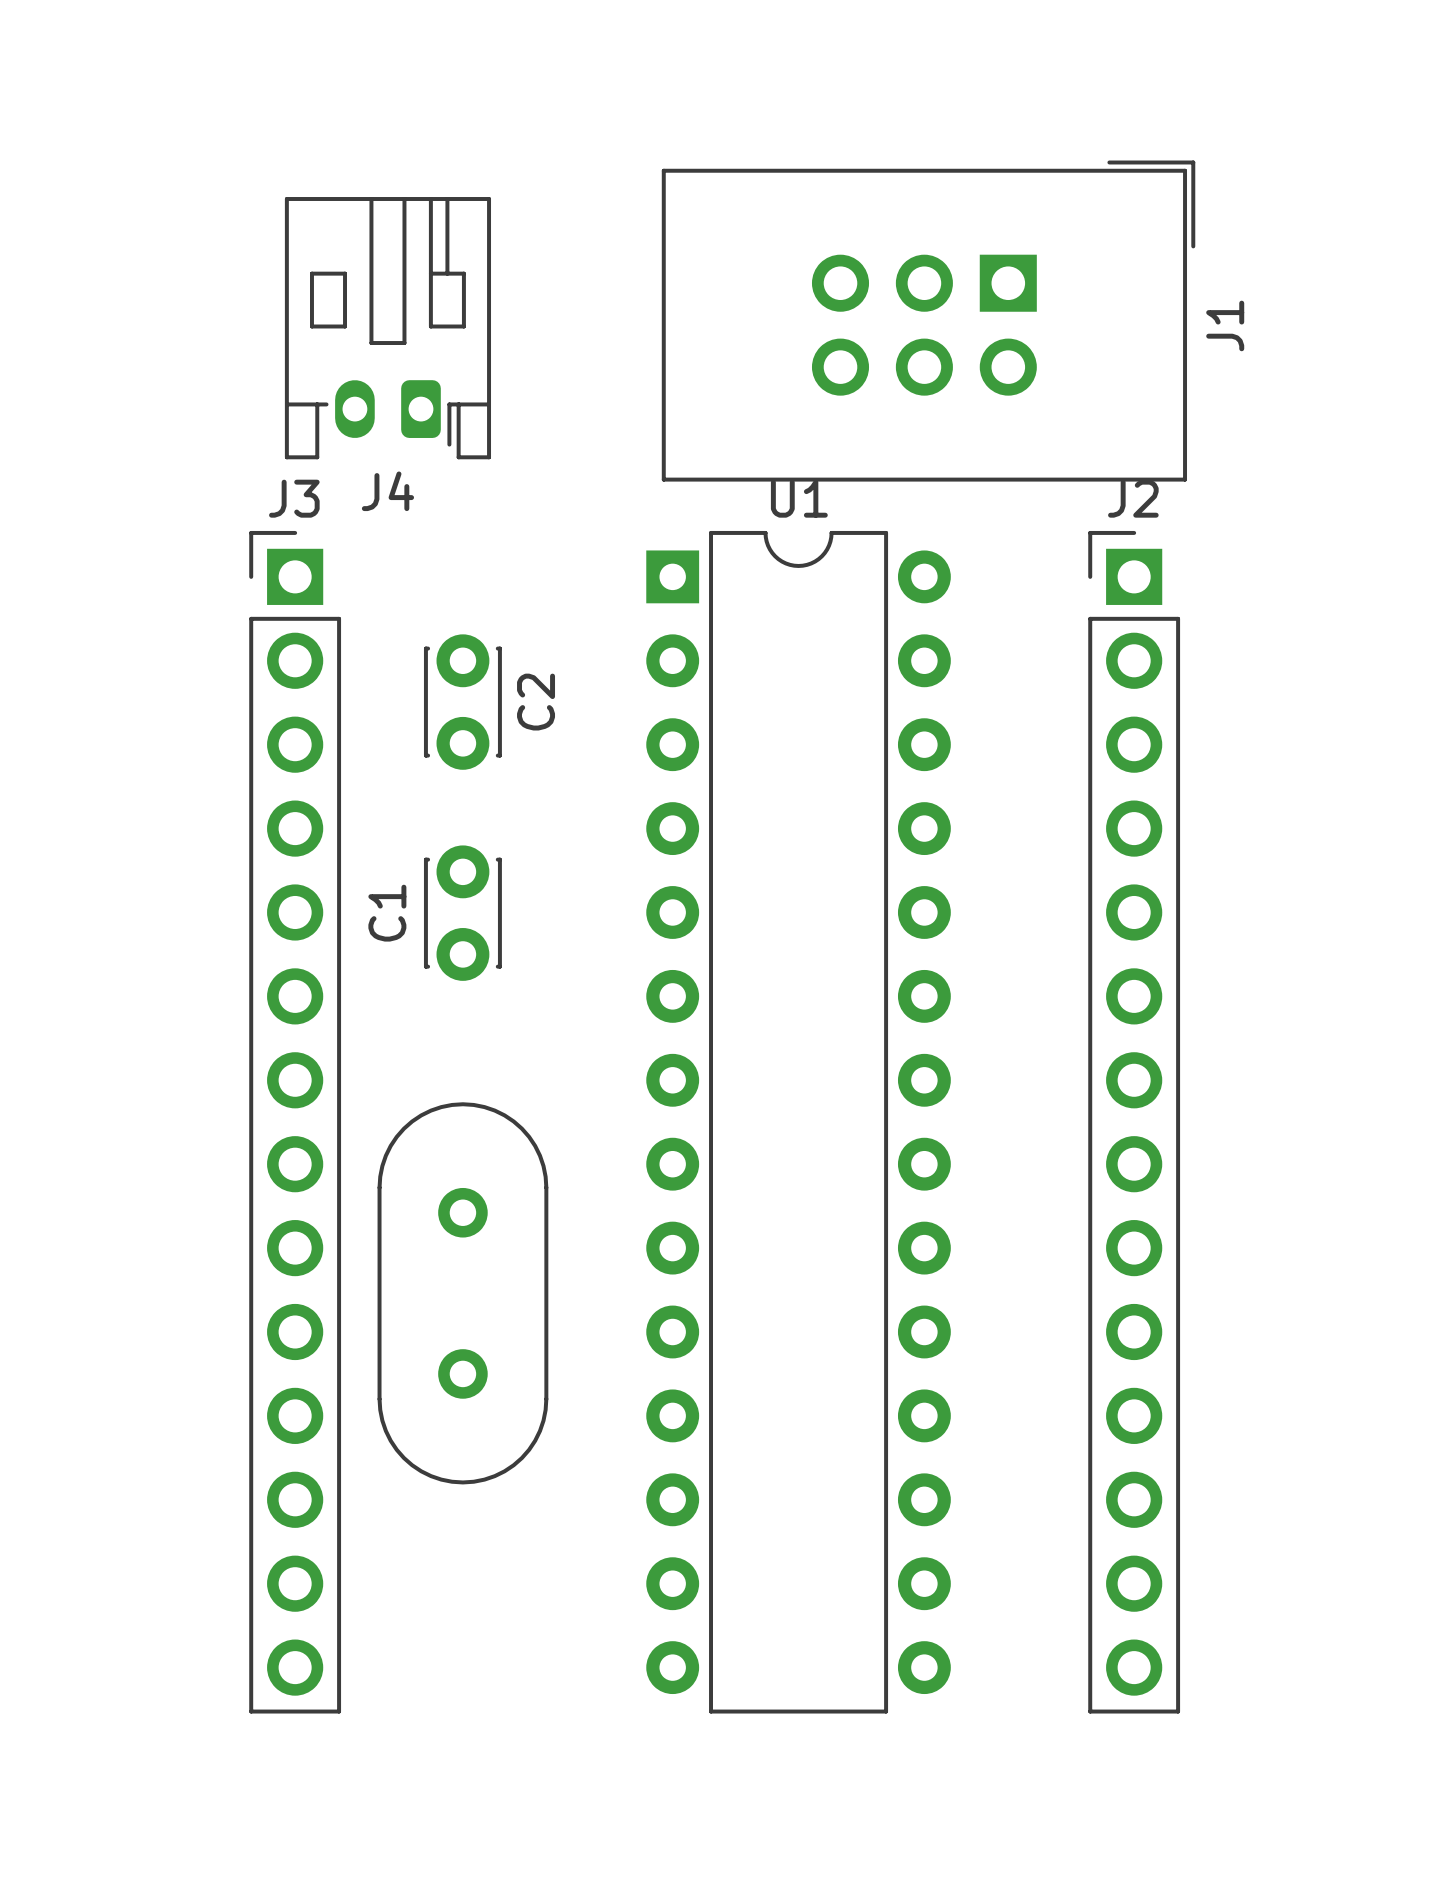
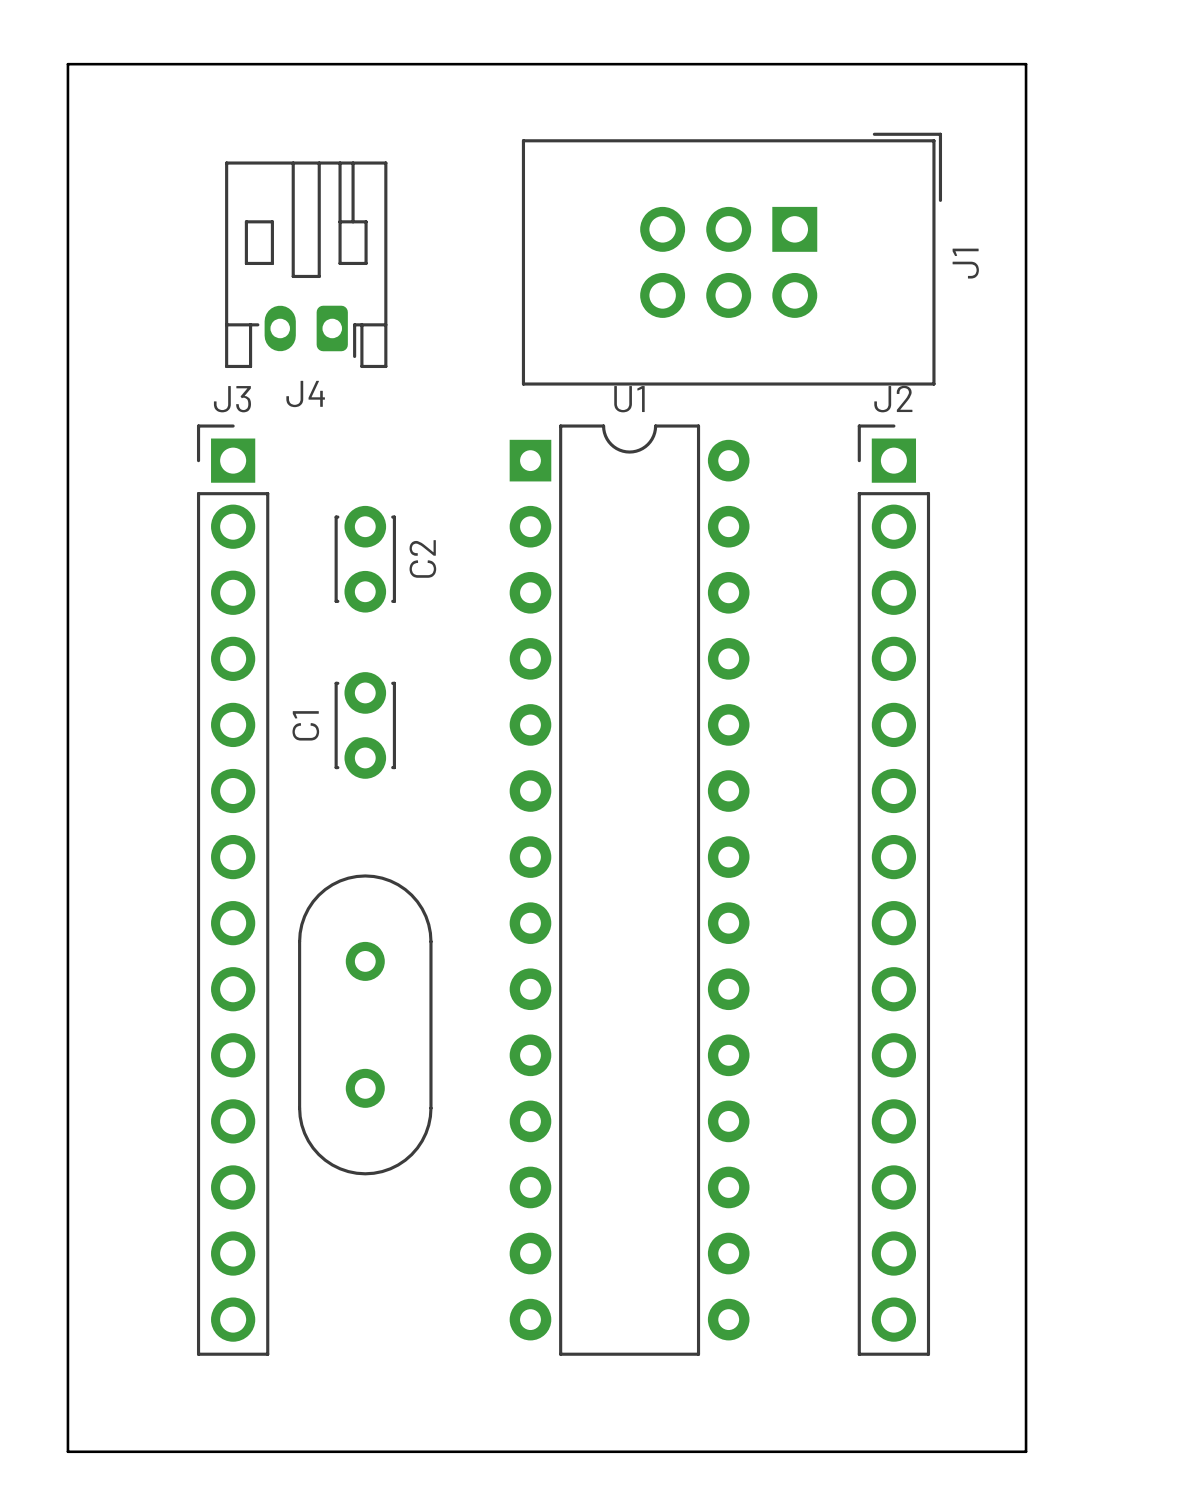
board edge: none -> (67, 64) (1026, 64) (1026, 1451) (67, 1451) (67, 64)

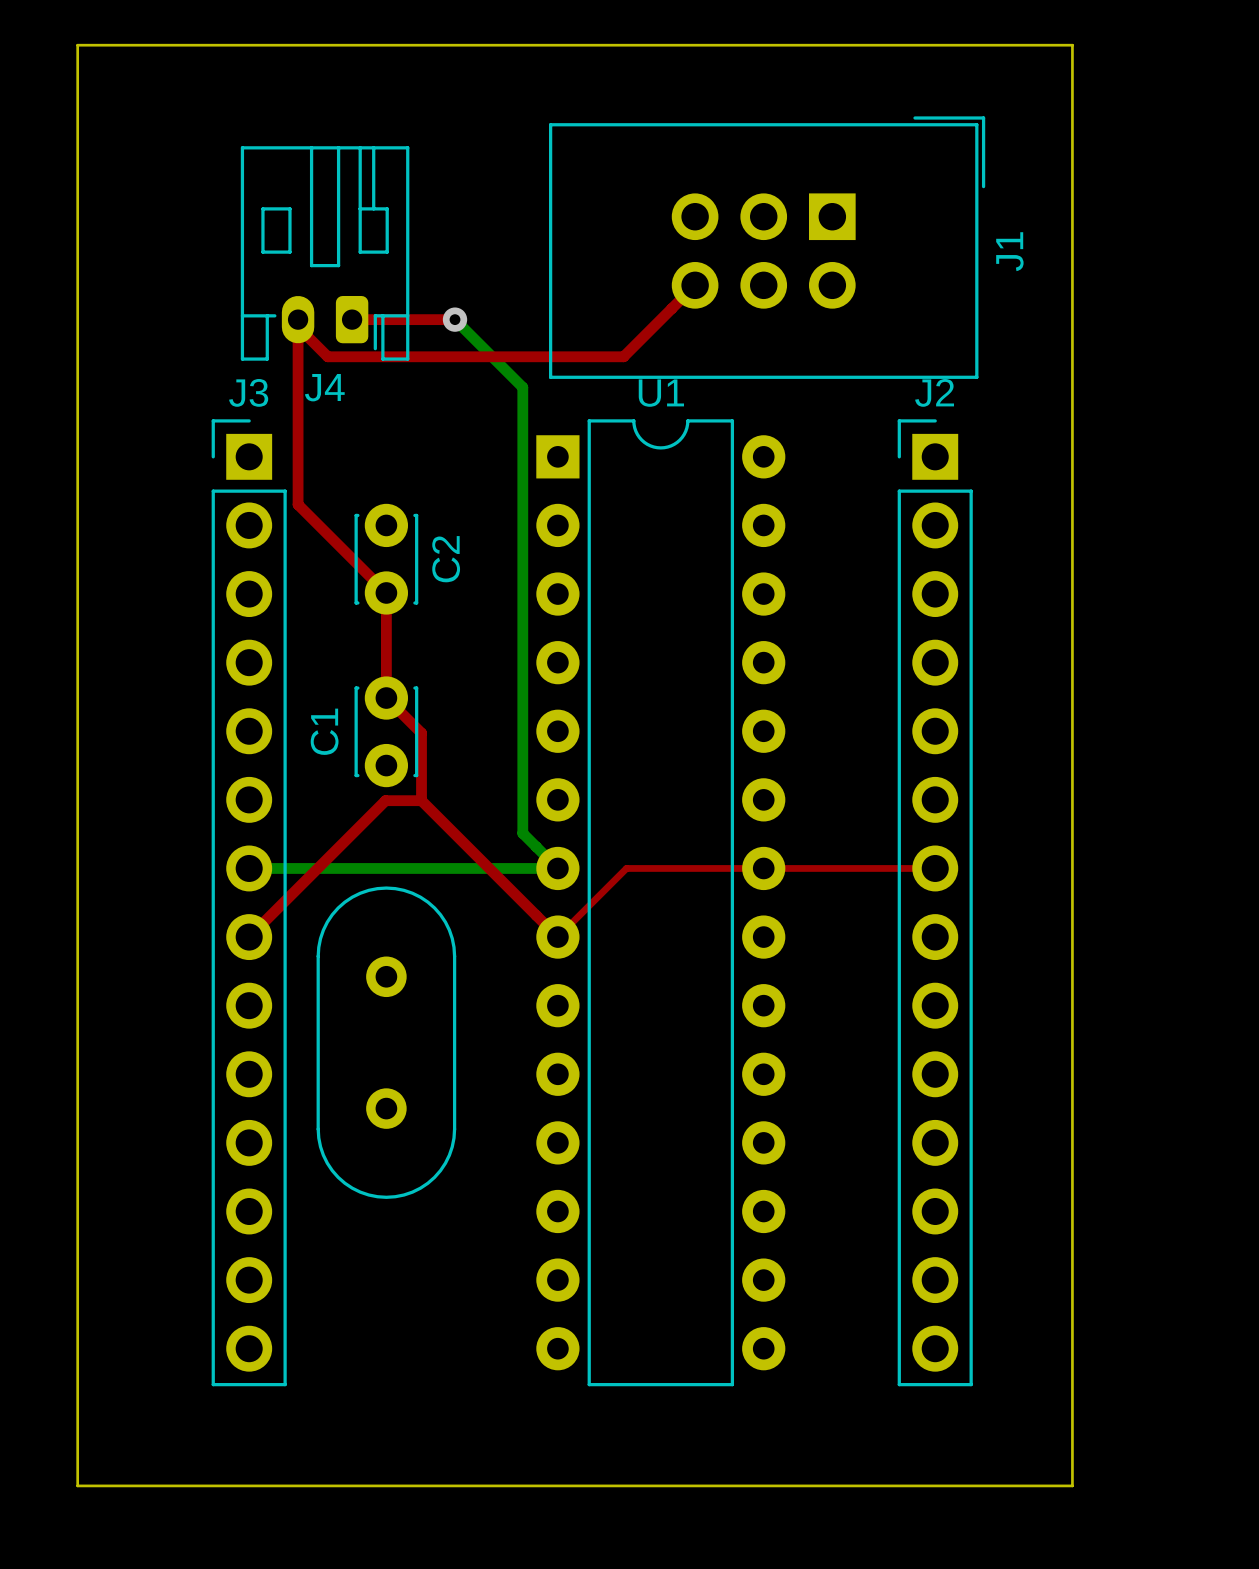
top track: none -> (695, 285) (623, 356) (327, 356) (298, 327)
top track: none -> (298, 319) (298, 504) (386, 592) (386, 698) (421, 733) (421, 800)
top track: none -> (352, 319) (455, 319)
bottom track: none -> (455, 319) (522, 387) (522, 833) (557, 868) (249, 868)
via: none -> (455, 319)
top track: none -> (421, 800) (557, 937) (626, 868) (935, 868)
top track: none -> (421, 800) (385, 800) (249, 937)

